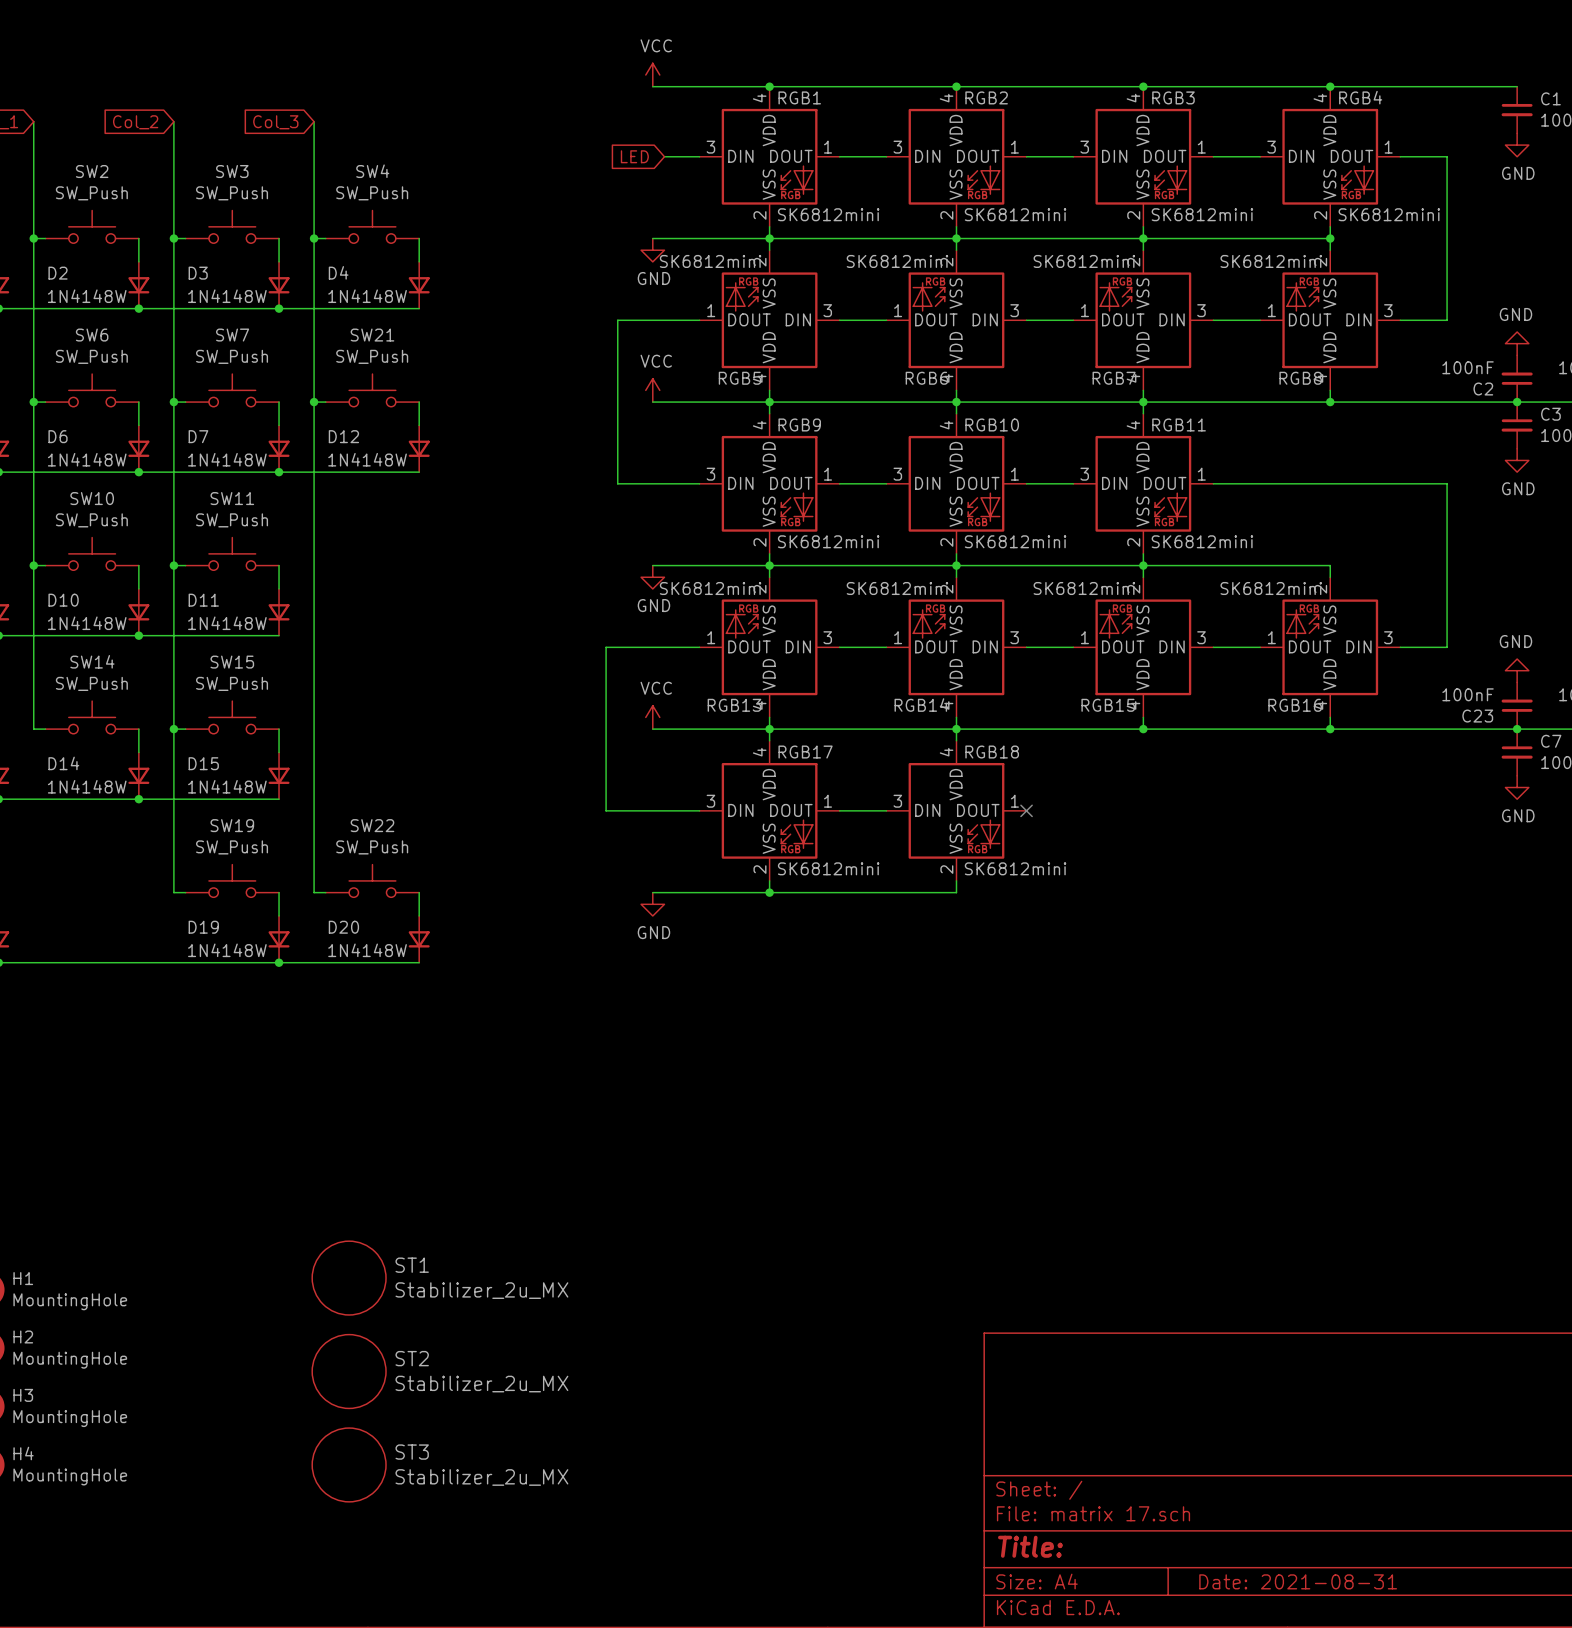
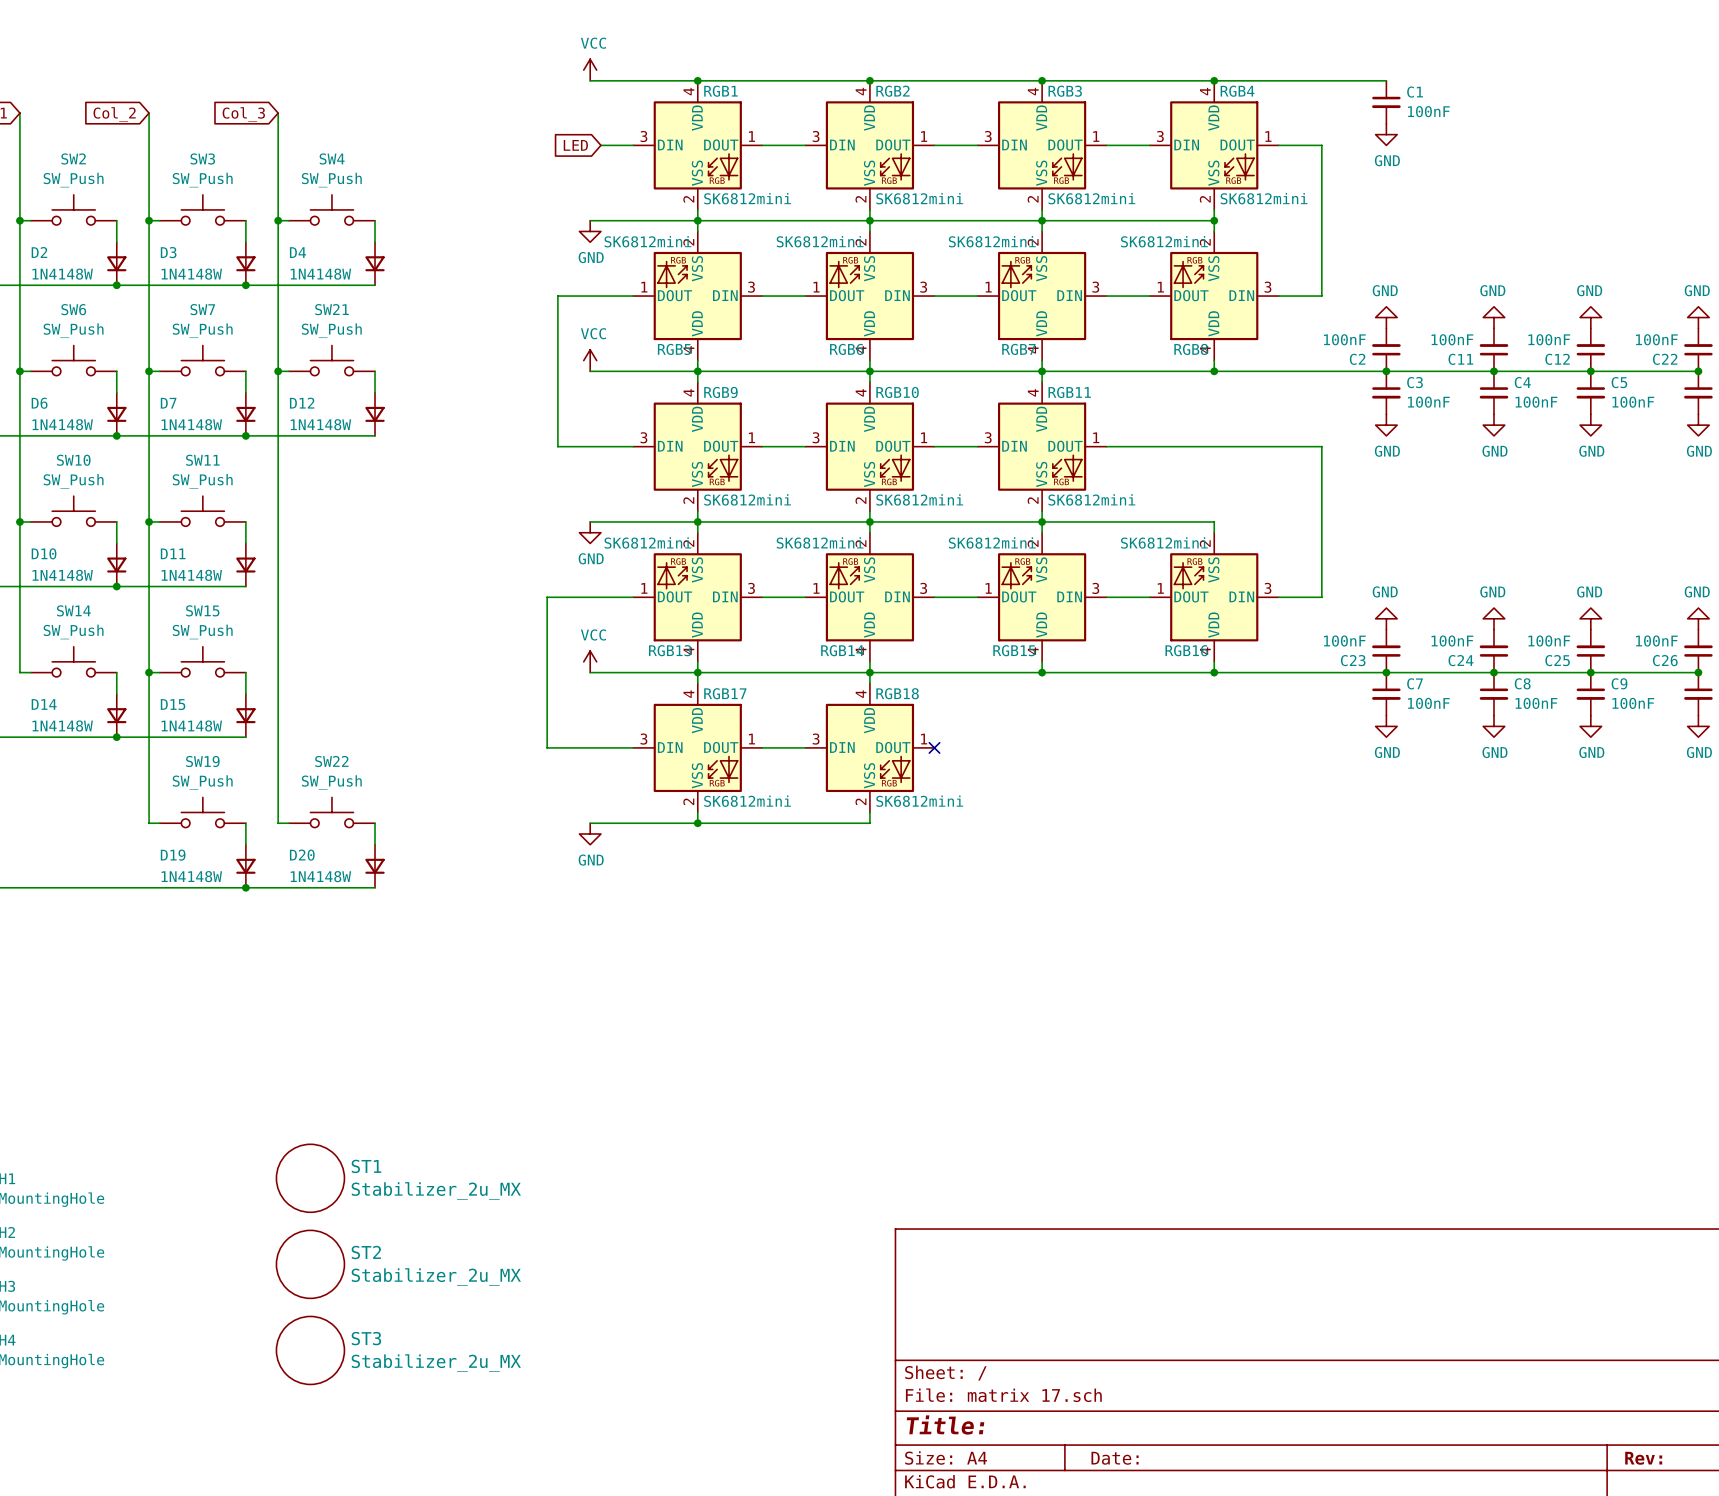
title block: Date: 2021-08-31 (1298, 1581) -> Date: (1115, 1458)

